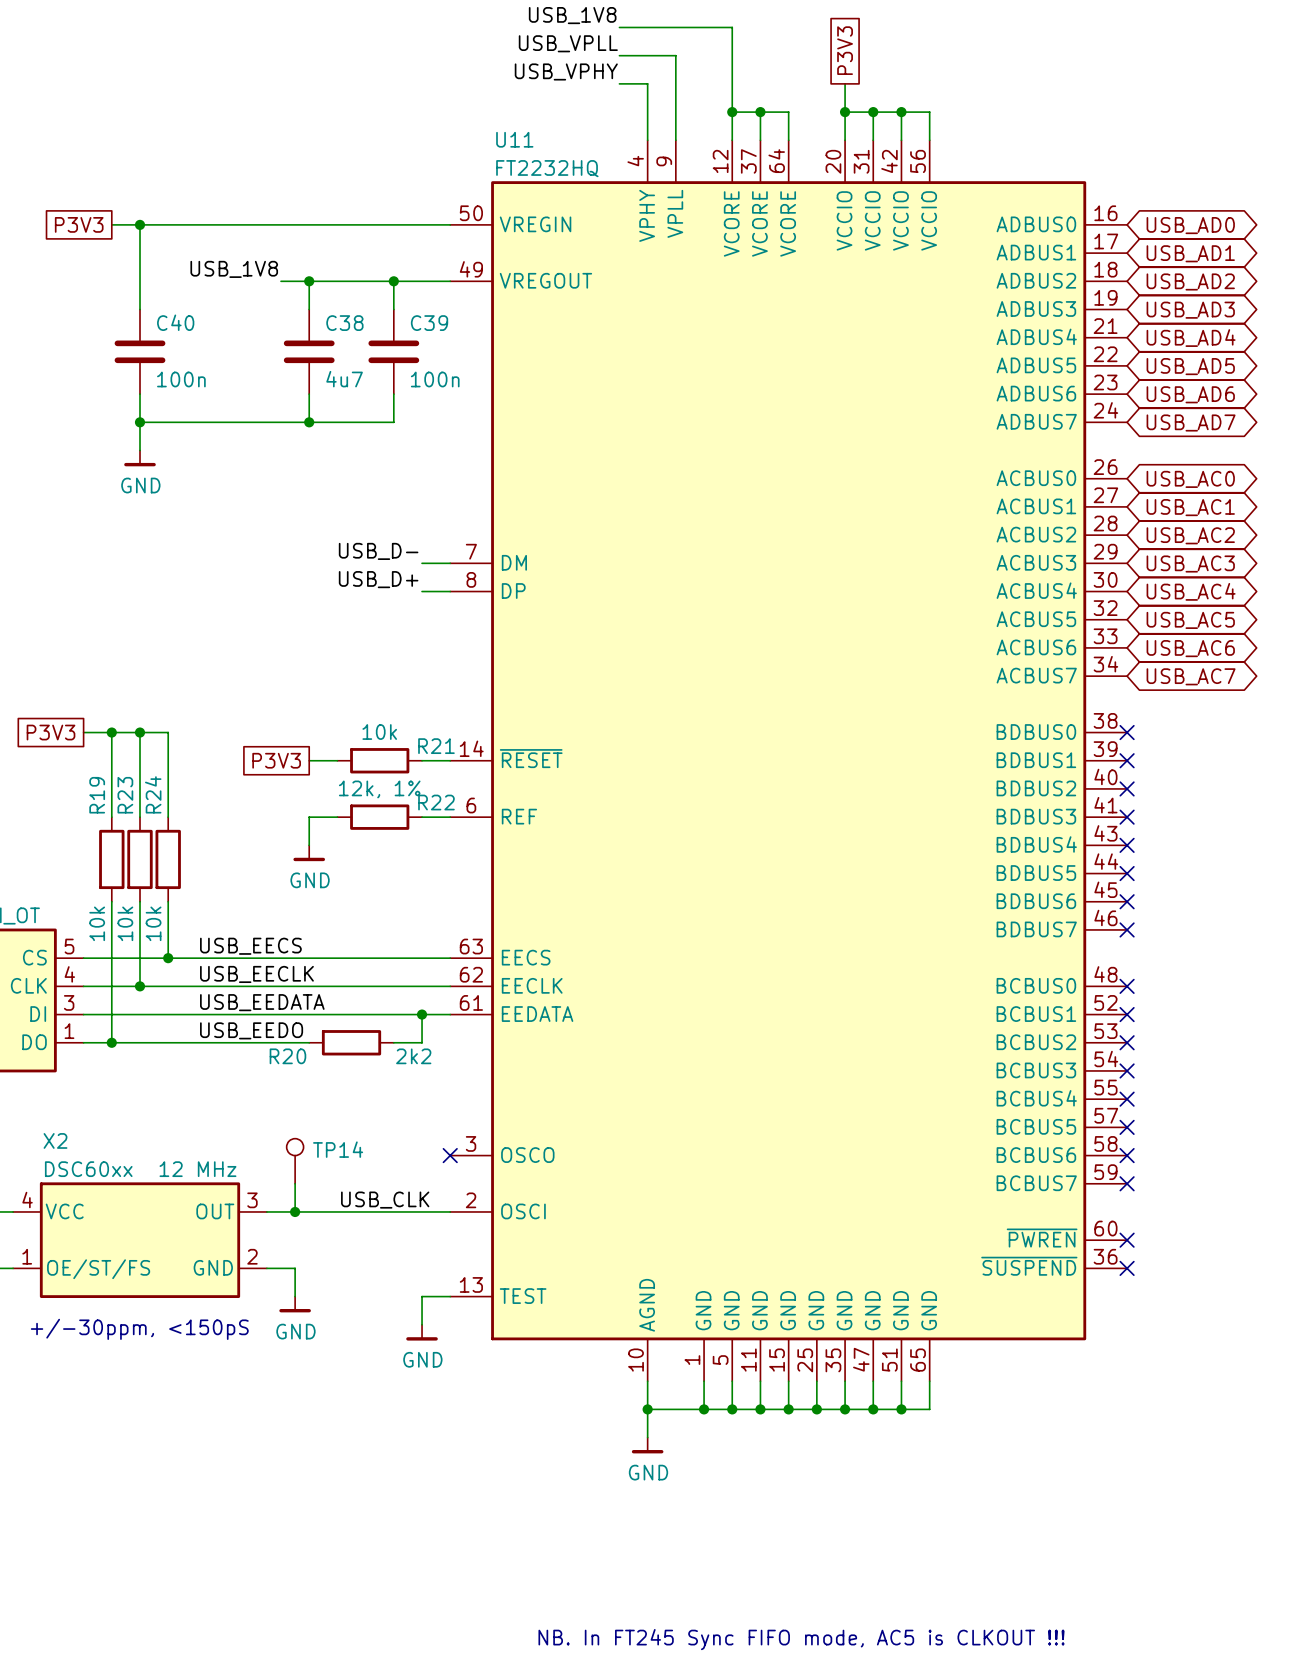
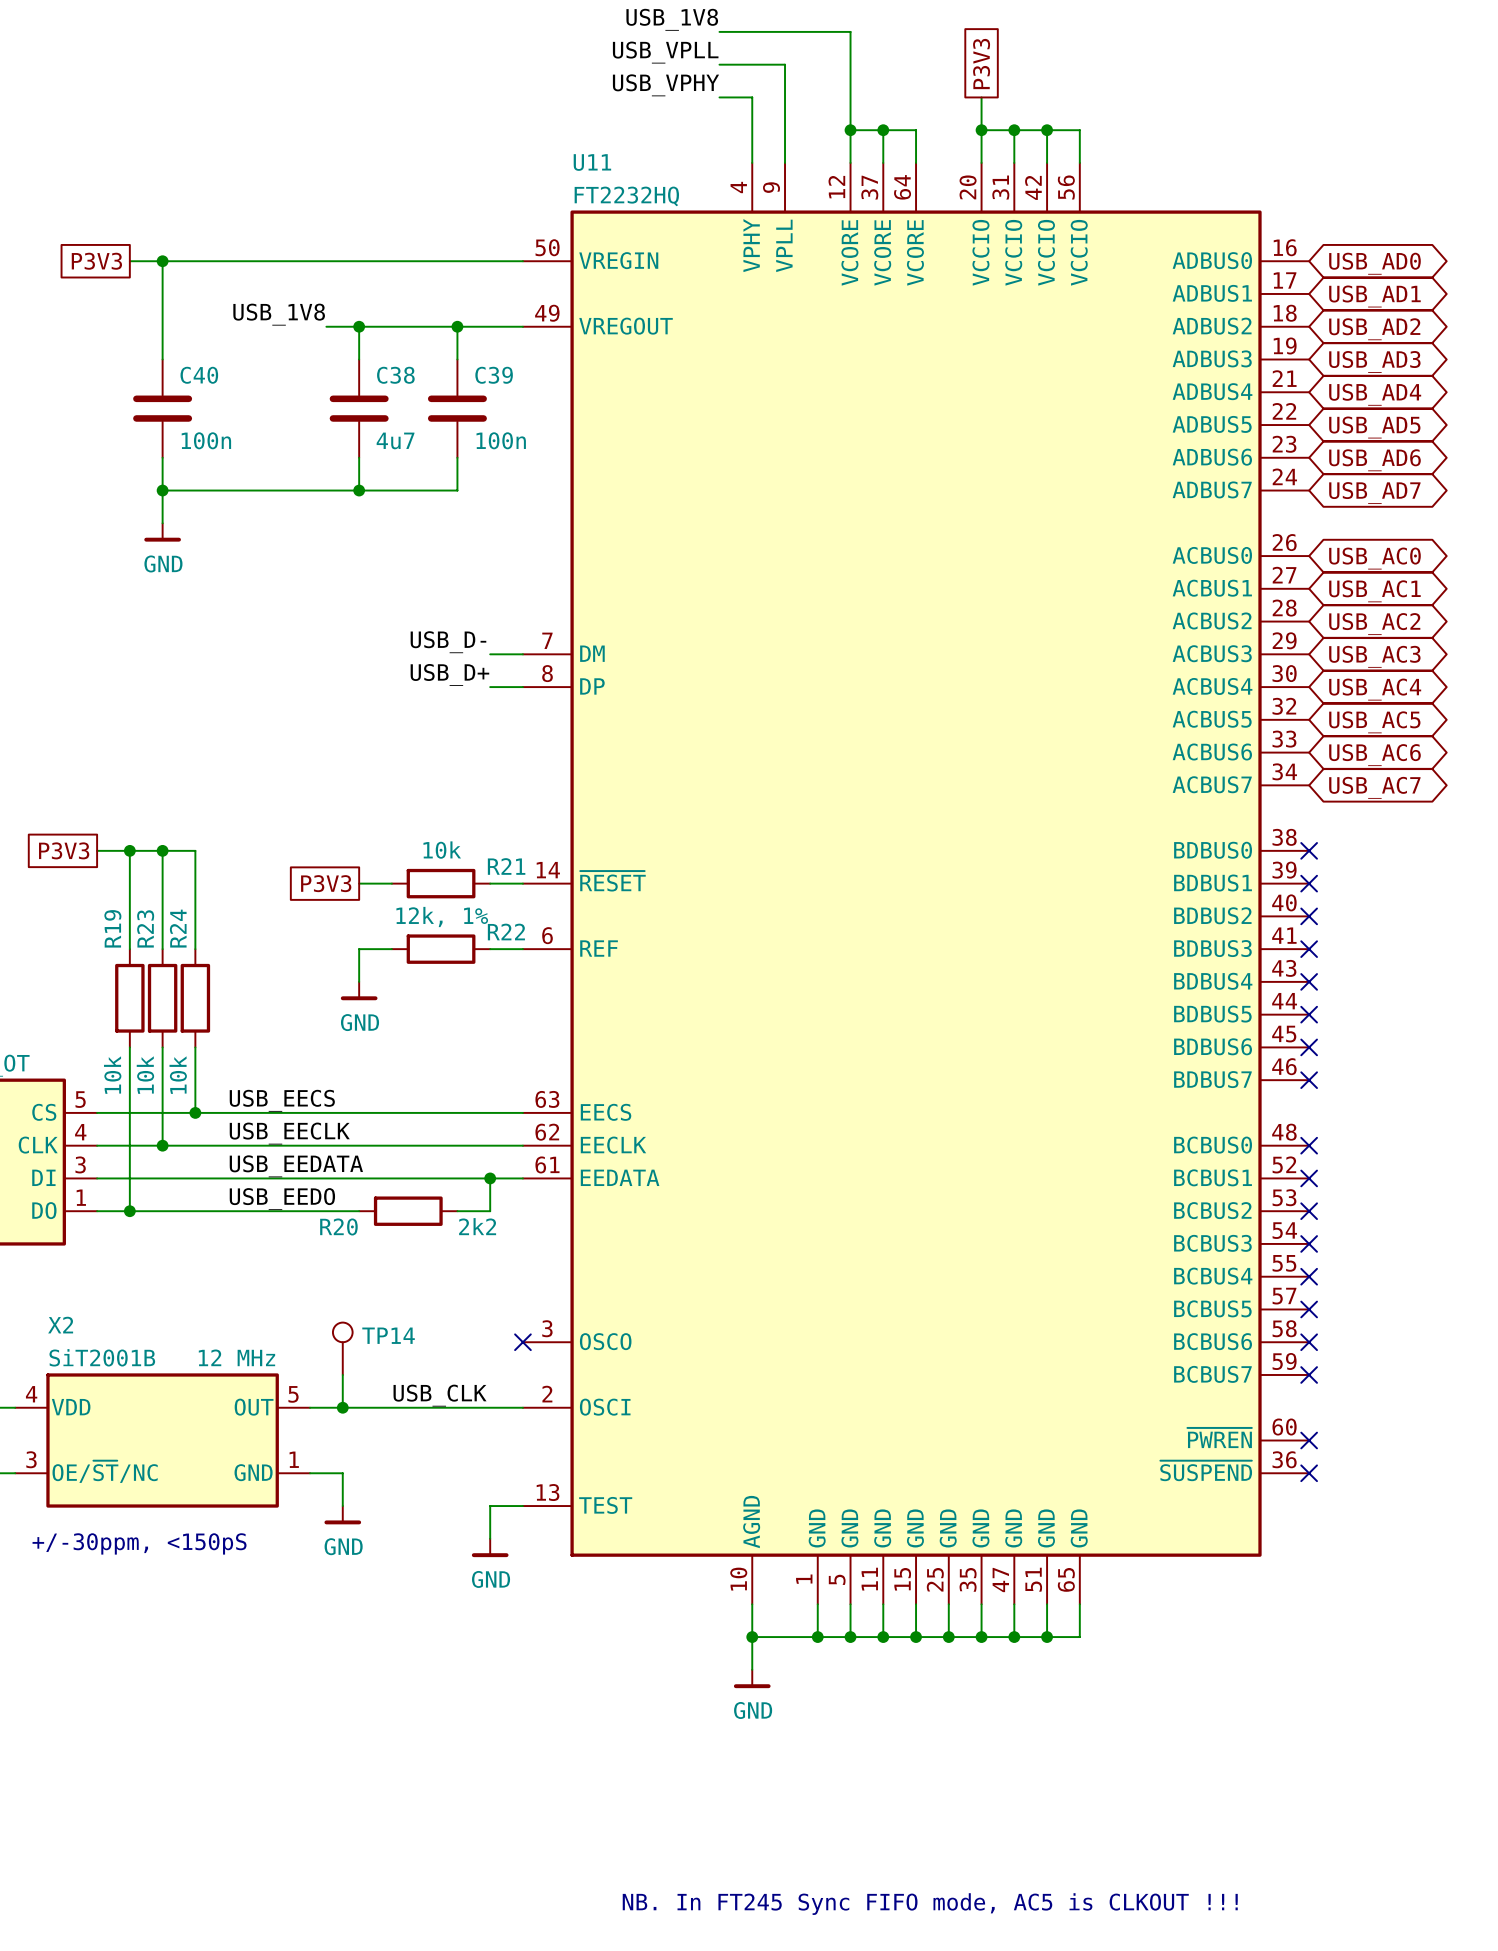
X2 value: DSC60xx (88, 1169) -> SiT2001B (102, 1357)
X2 pin number: 3 (252, 1200) -> 5 (293, 1394)
X2 pin name: VCC (64, 1211) -> VDD (71, 1407)
X2 pin number: 1 (27, 1256) -> 3 (31, 1459)
X2 pin number: 2 (252, 1256) -> 1 (294, 1459)
X2 pin name: OE/ST/FS (98, 1269) -> OE/~{ST}/NC (105, 1471)

